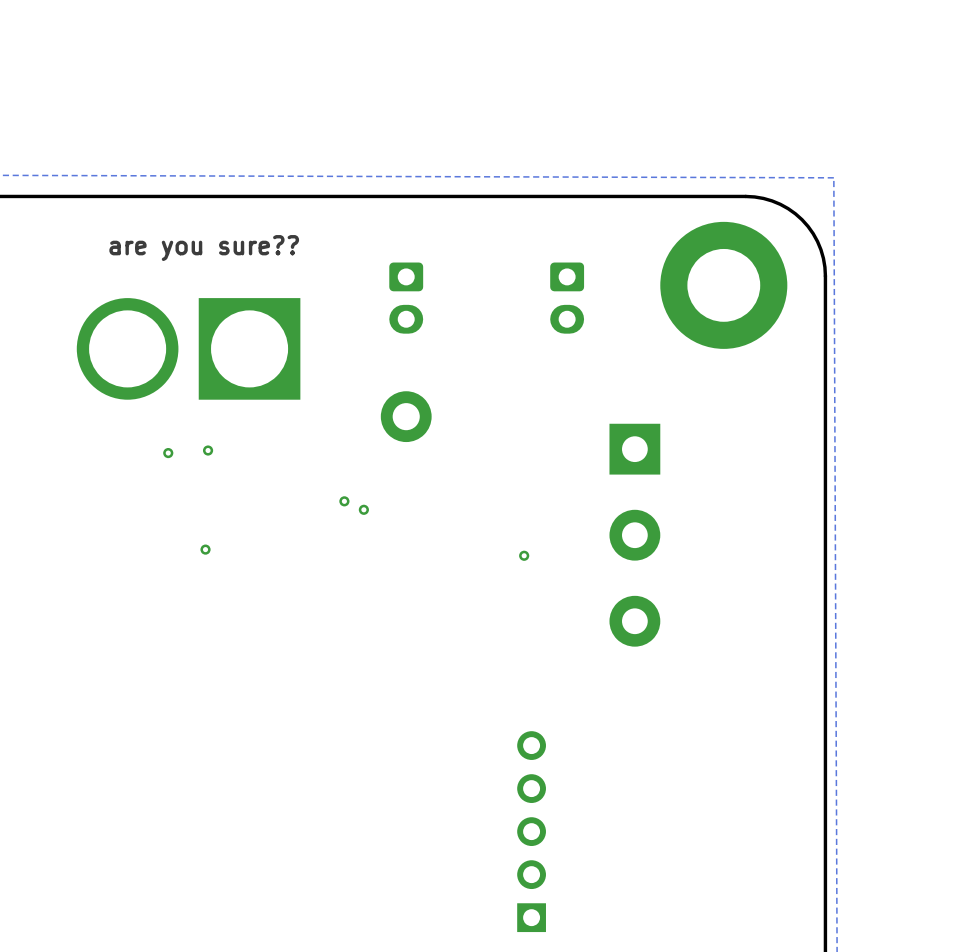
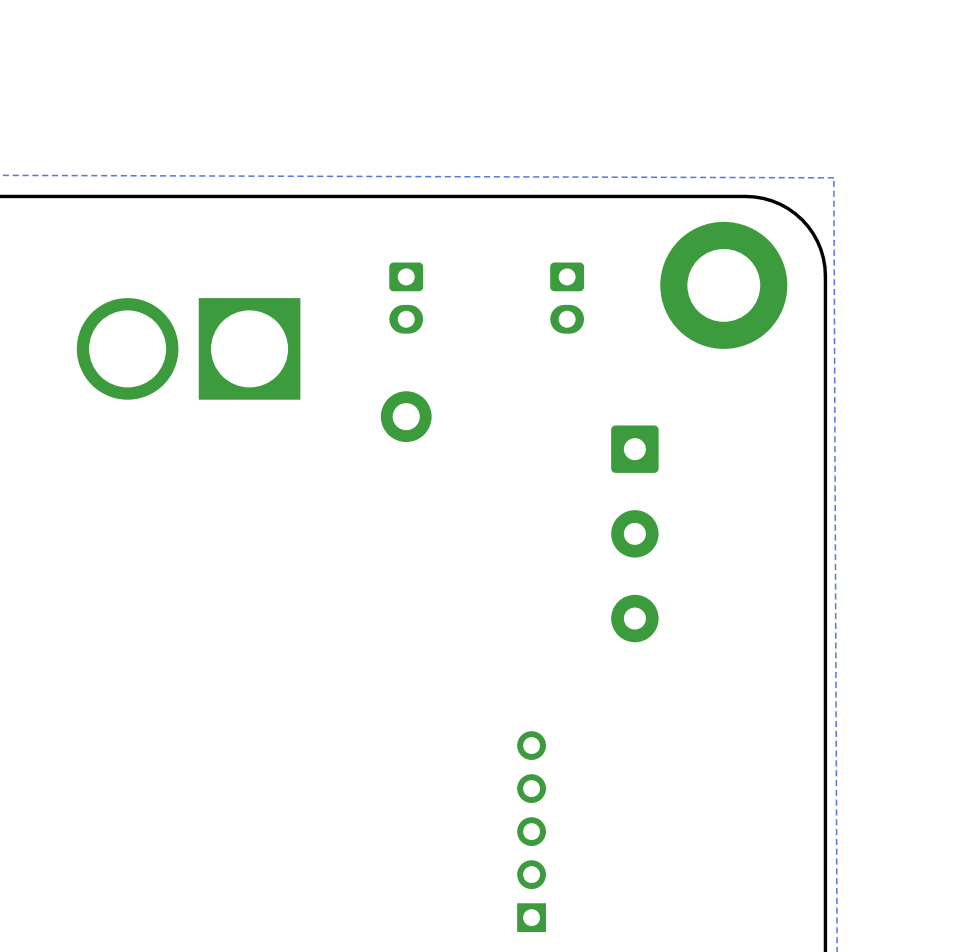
text: are you sure?? (204, 248) -> none
part footprint: [609, 423, 661, 647] -> [611, 425, 659, 643]
via: (208, 450) -> none
via: (168, 453) -> none
via: (344, 501) -> none
via: (363, 509) -> none
via: (205, 549) -> none
via: (524, 555) -> none

